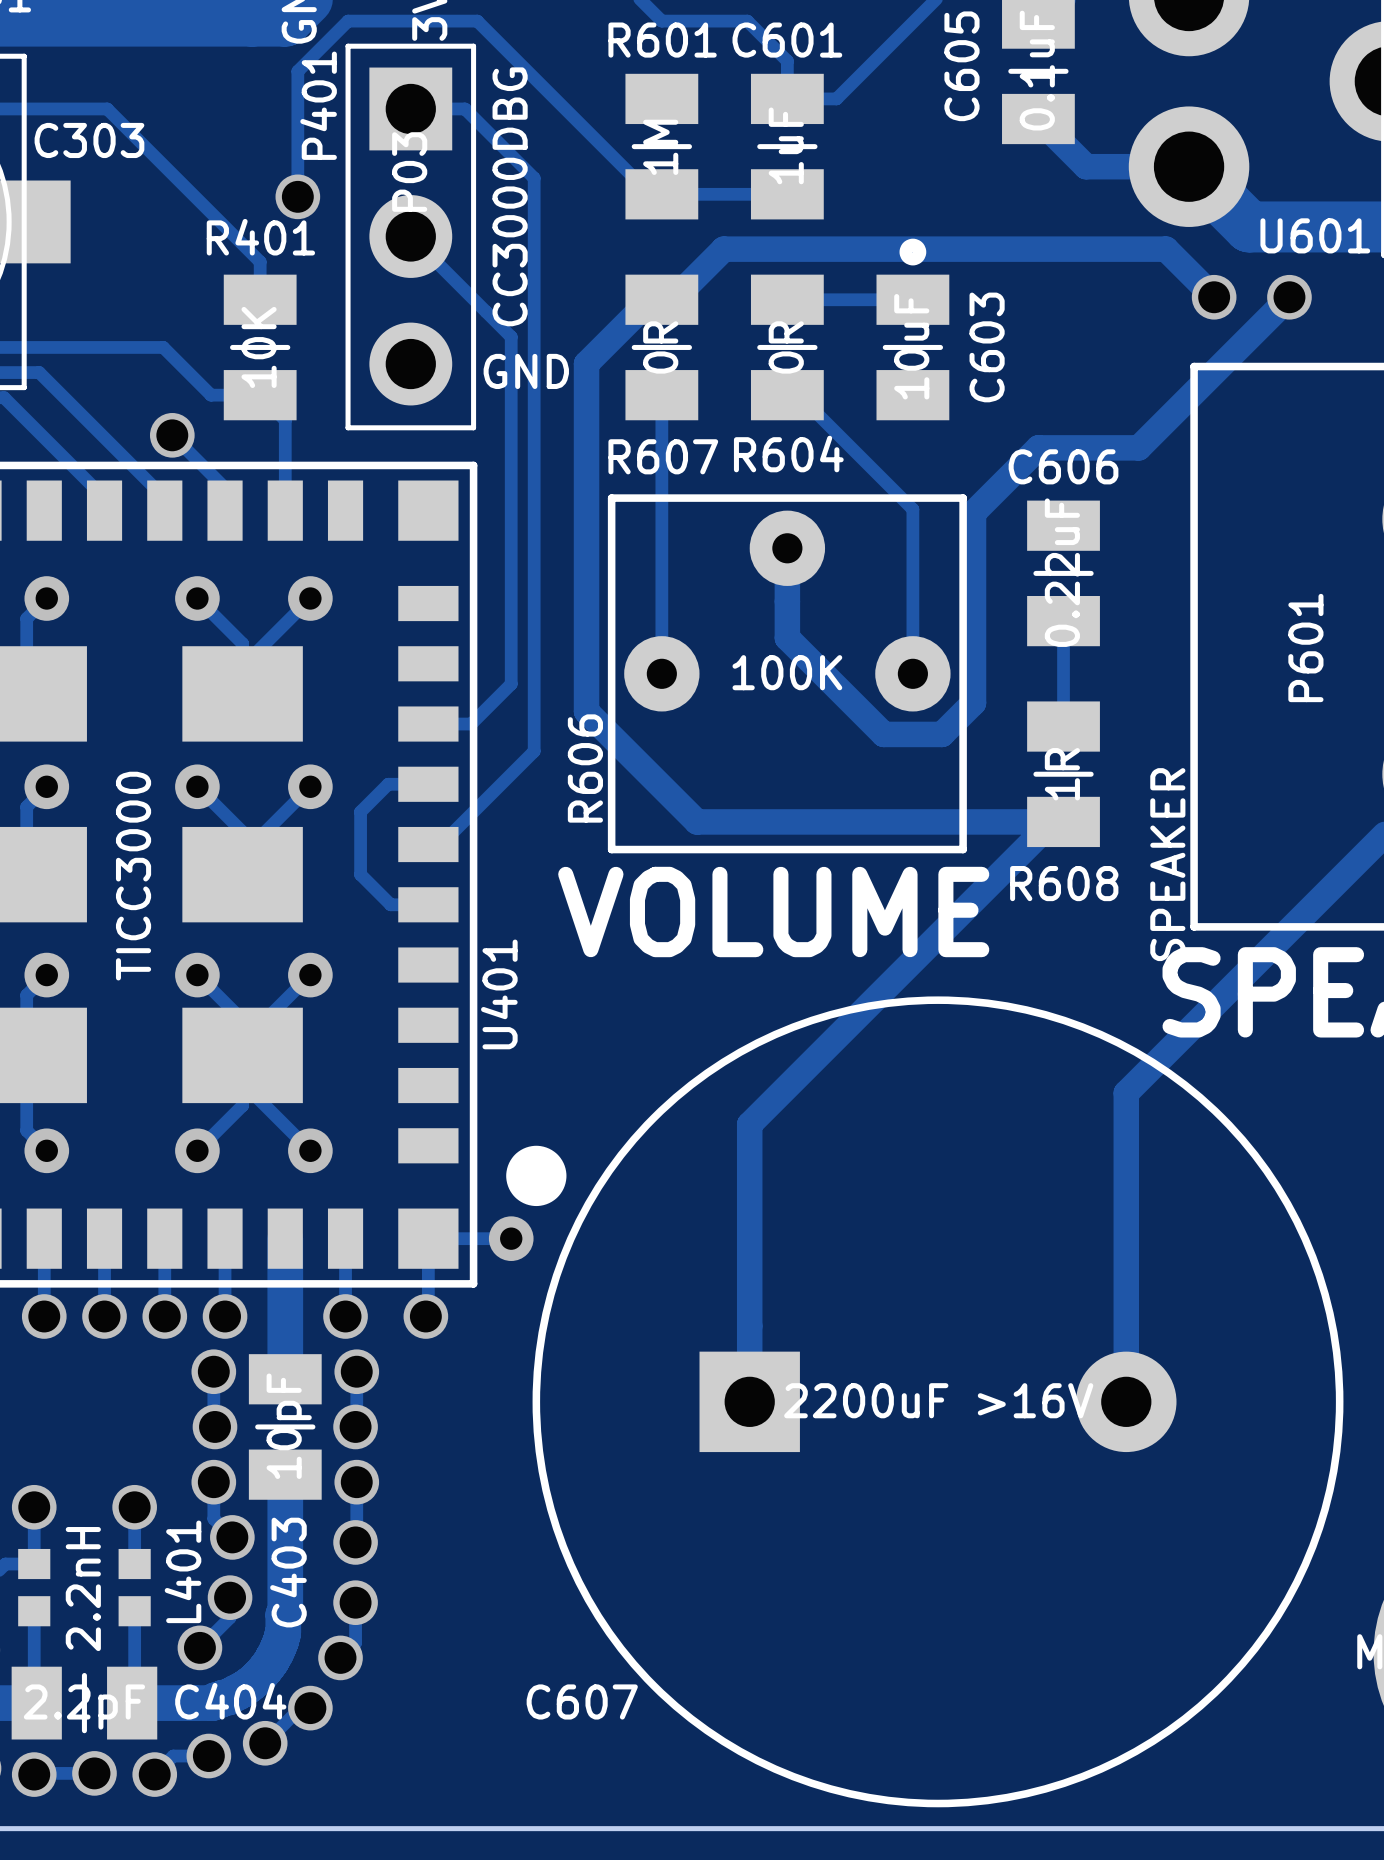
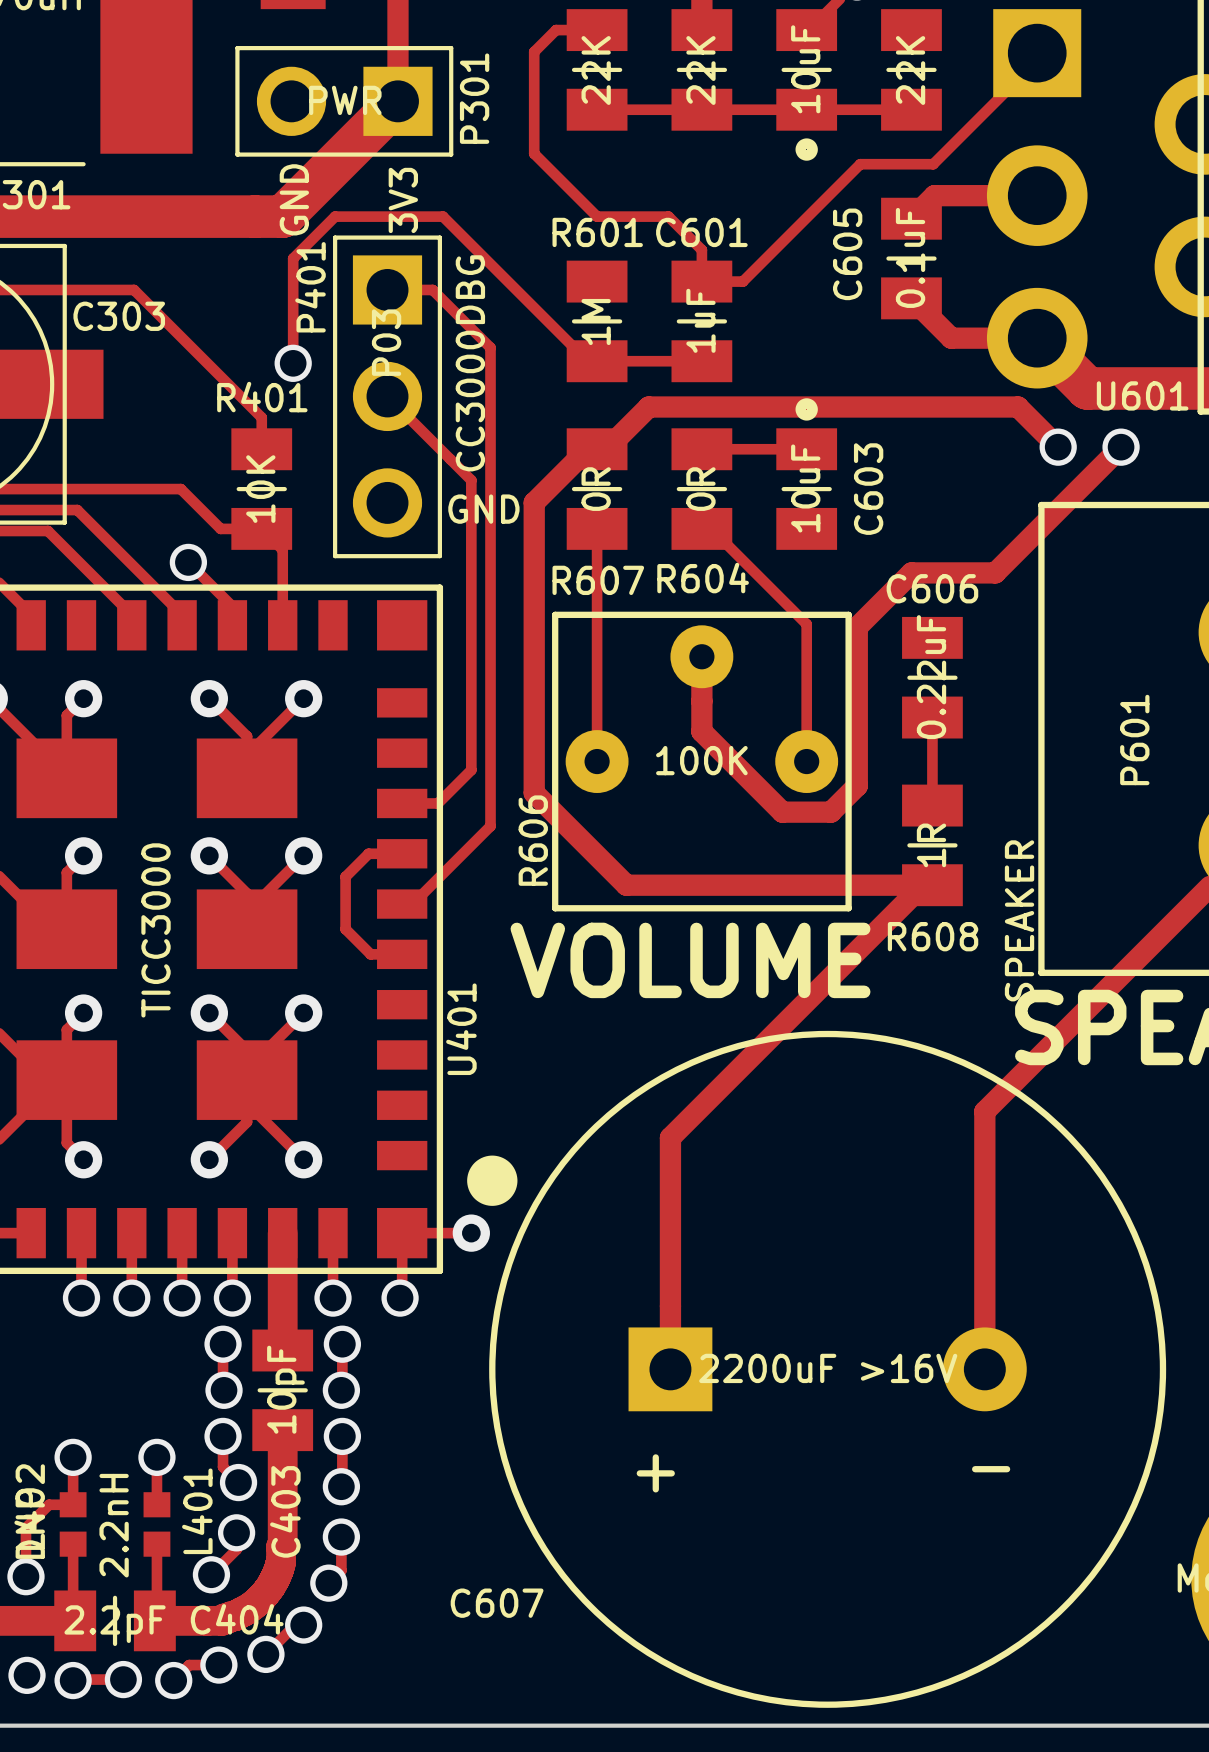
C607 text: none -> - (991, 1469)
C607 text: none -> + (655, 1473)
C607 name position: C607 (582, 1701) -> C607 (497, 1603)

